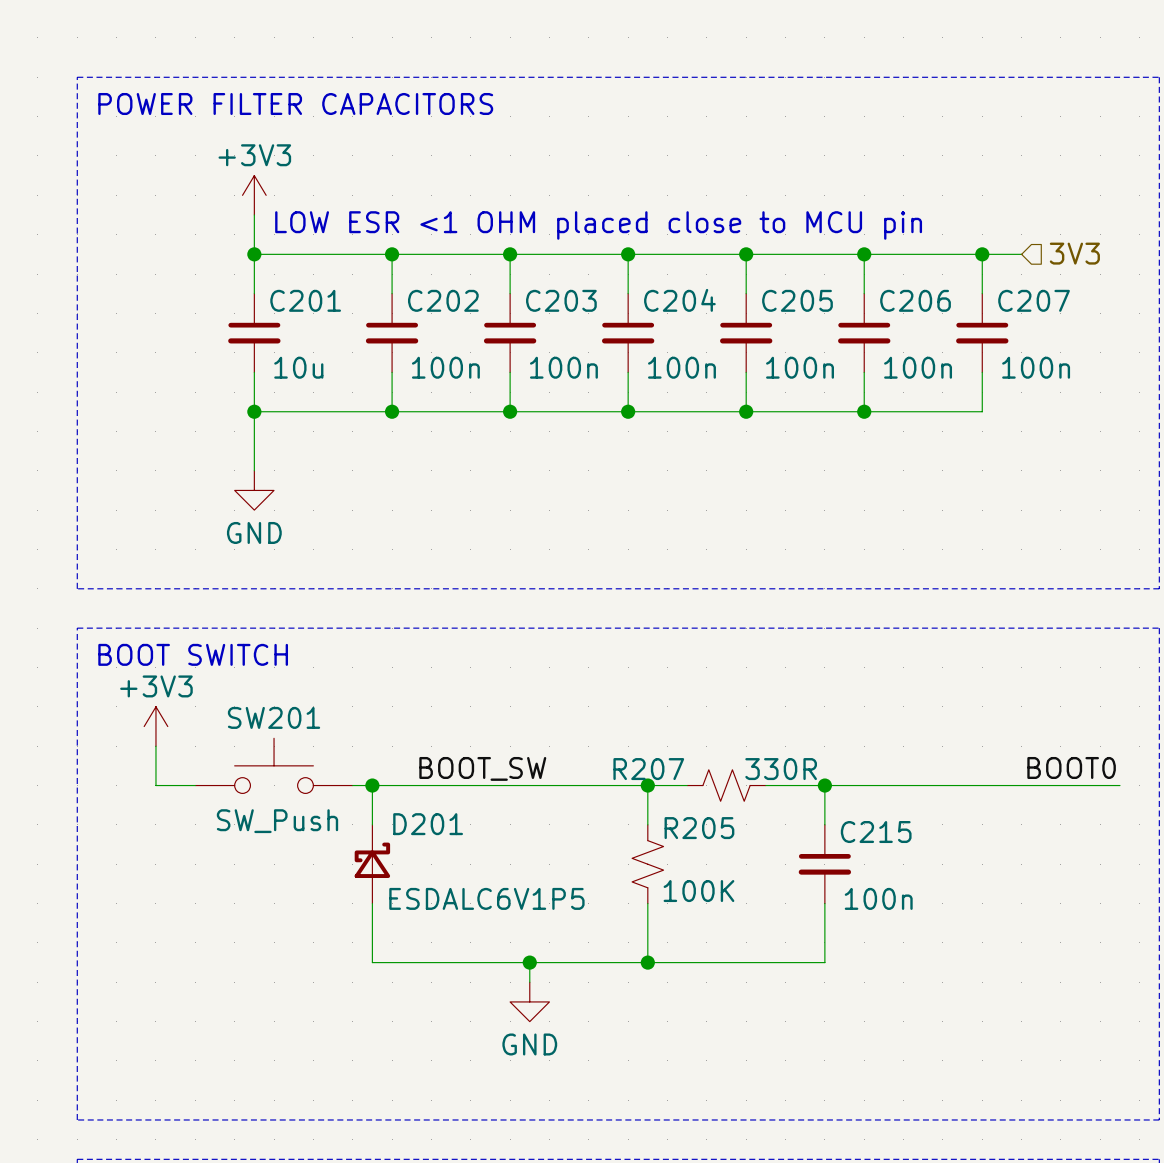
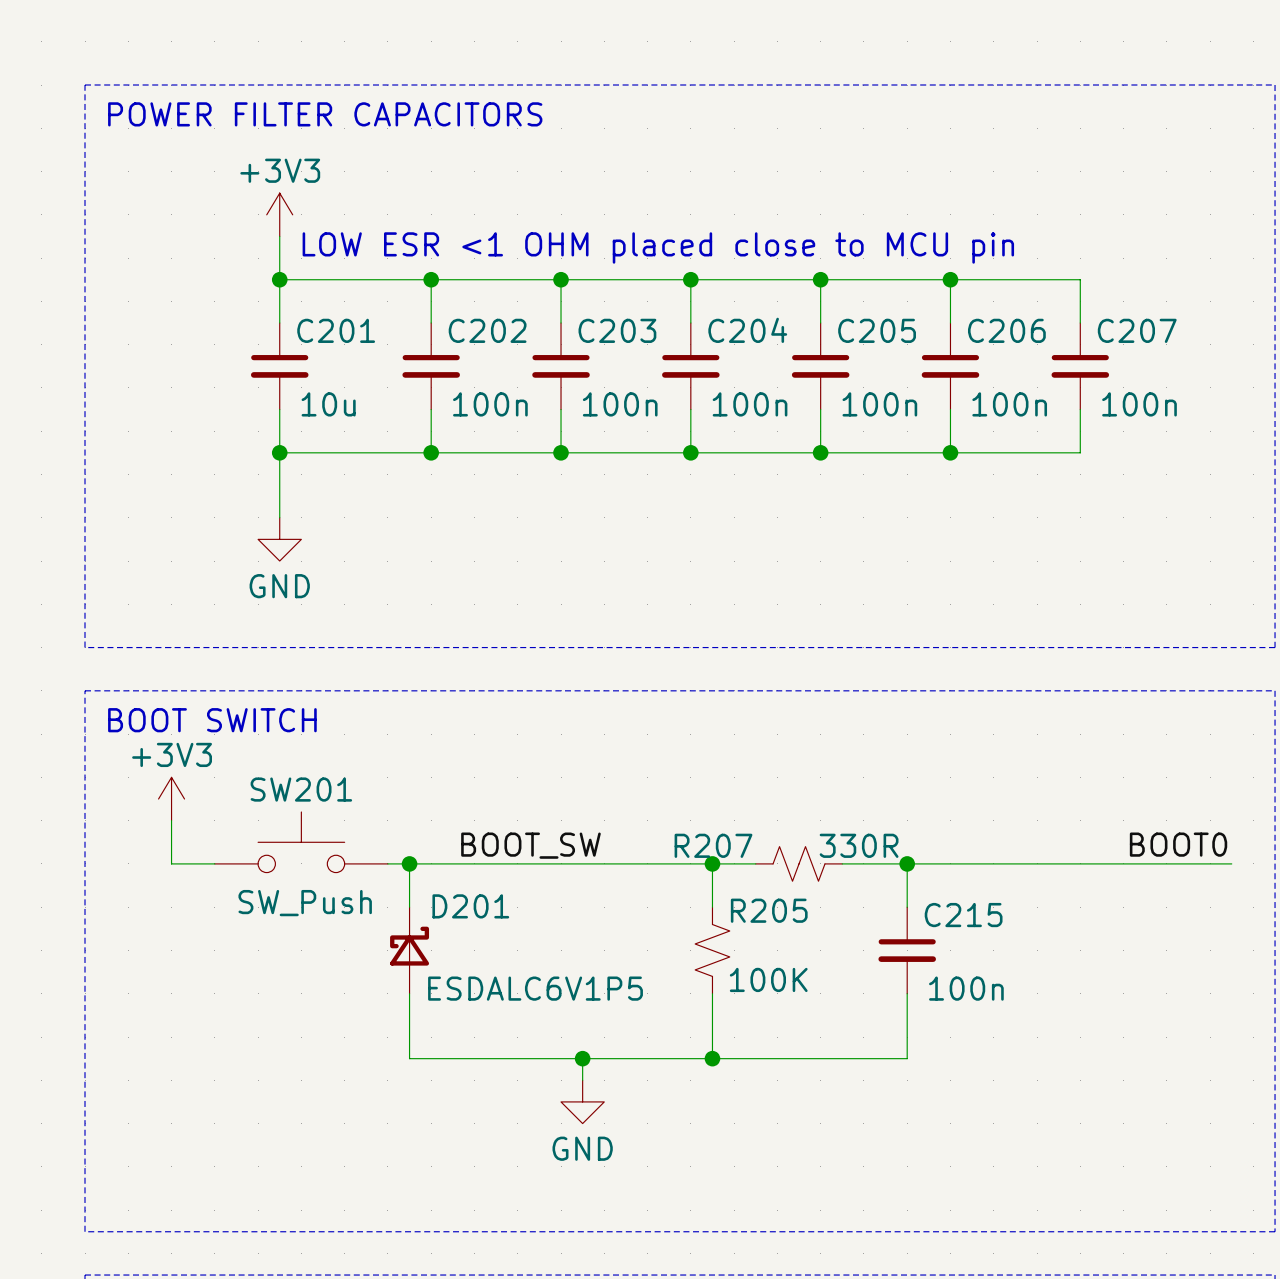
hierarchical label: 3V3 (1074, 253) -> none
wire: (982, 254) (1021, 254) -> none
junction: (982, 254) -> none

